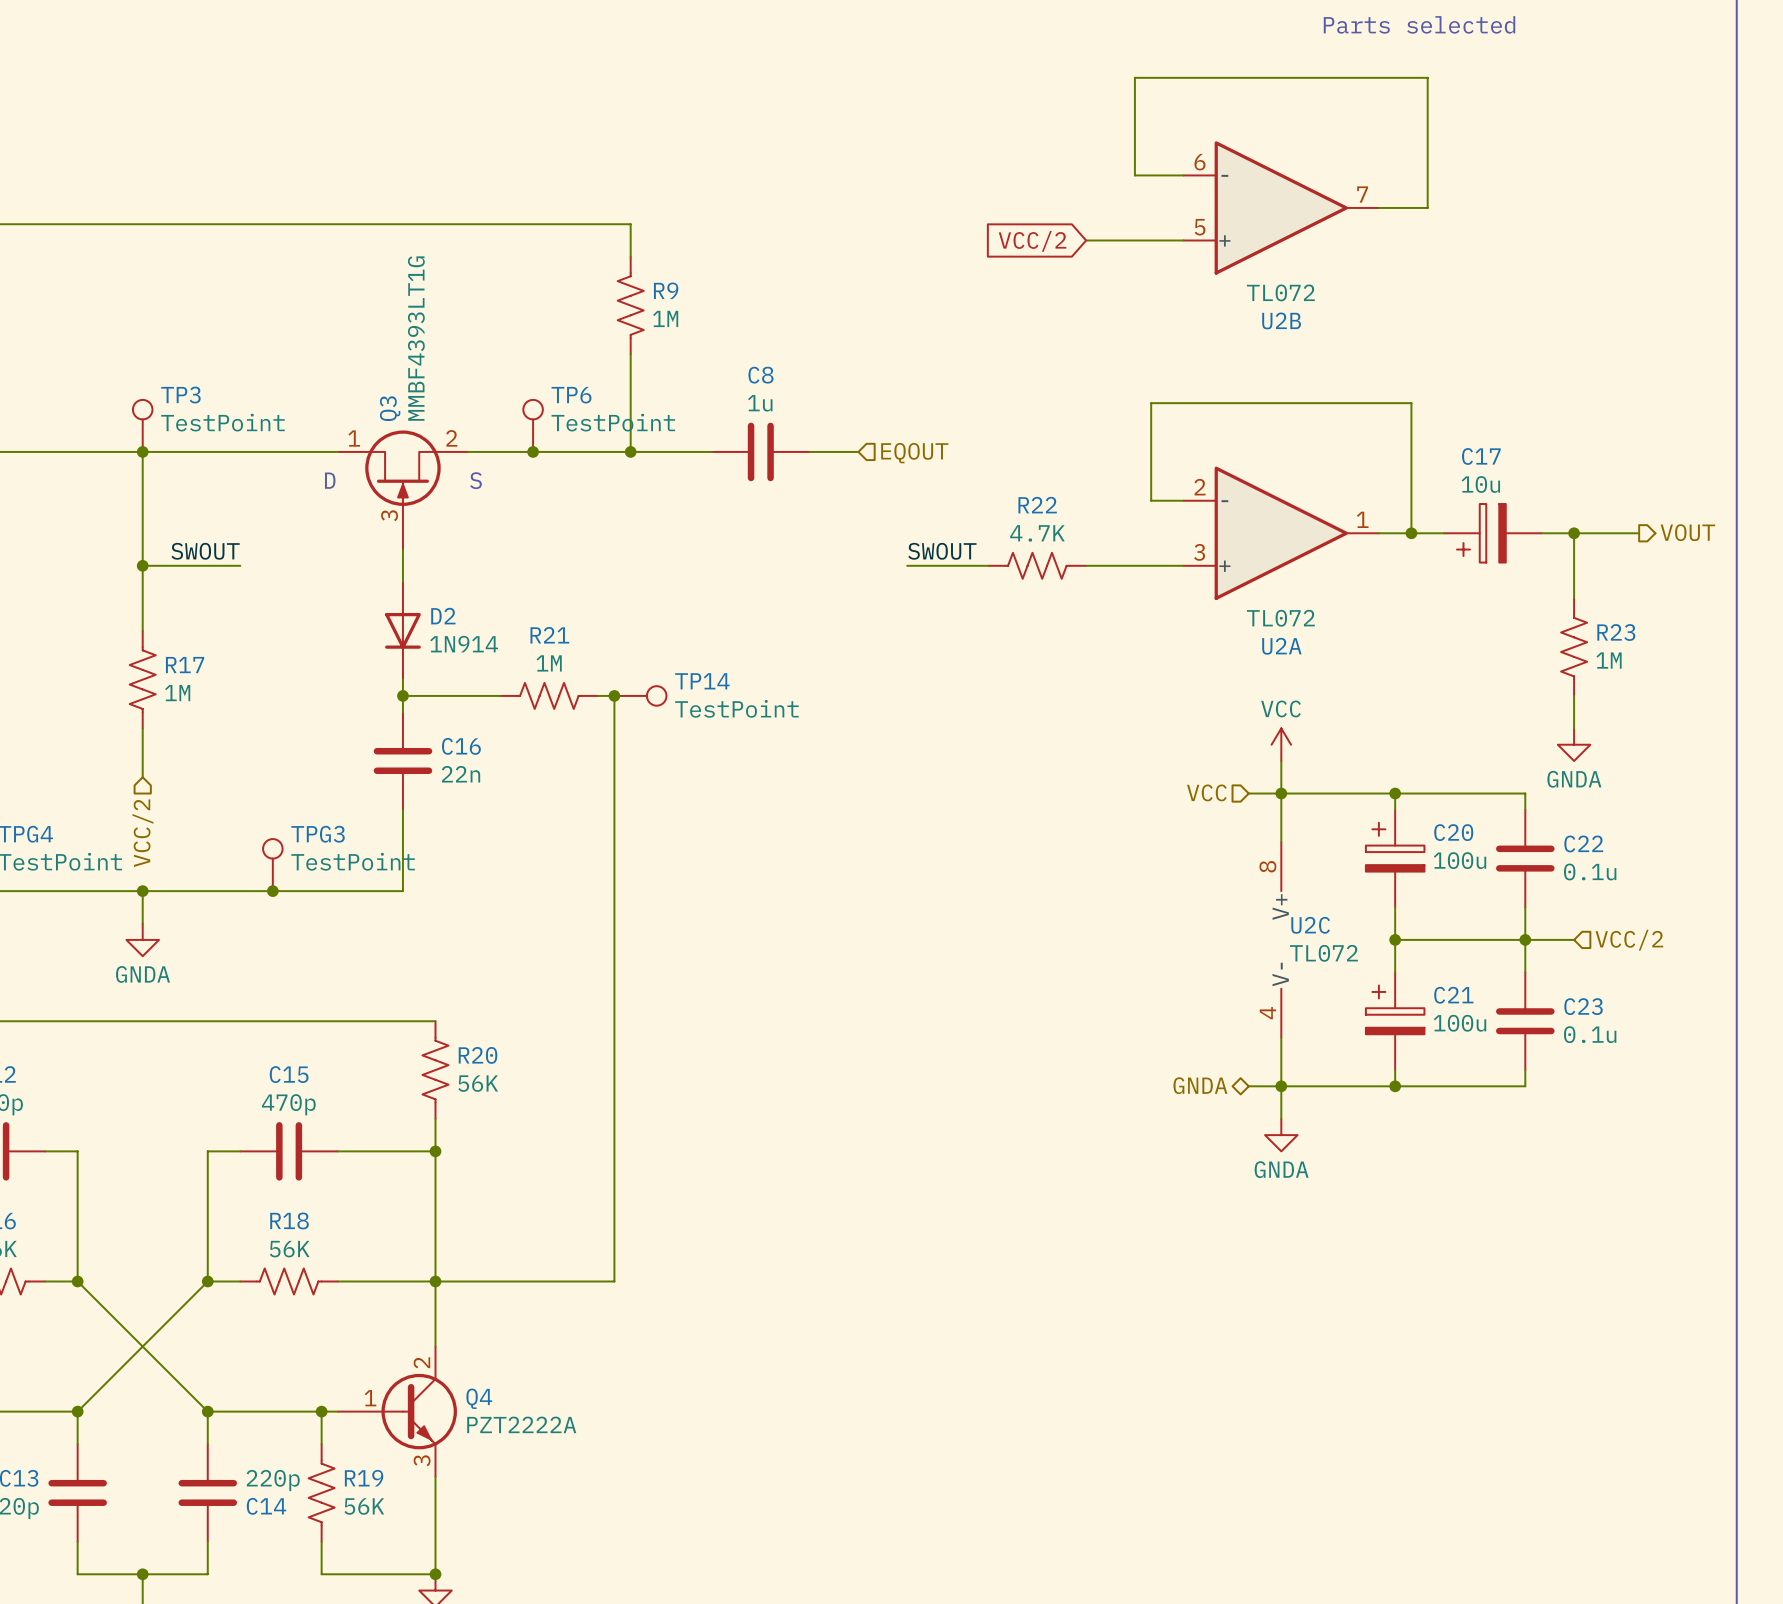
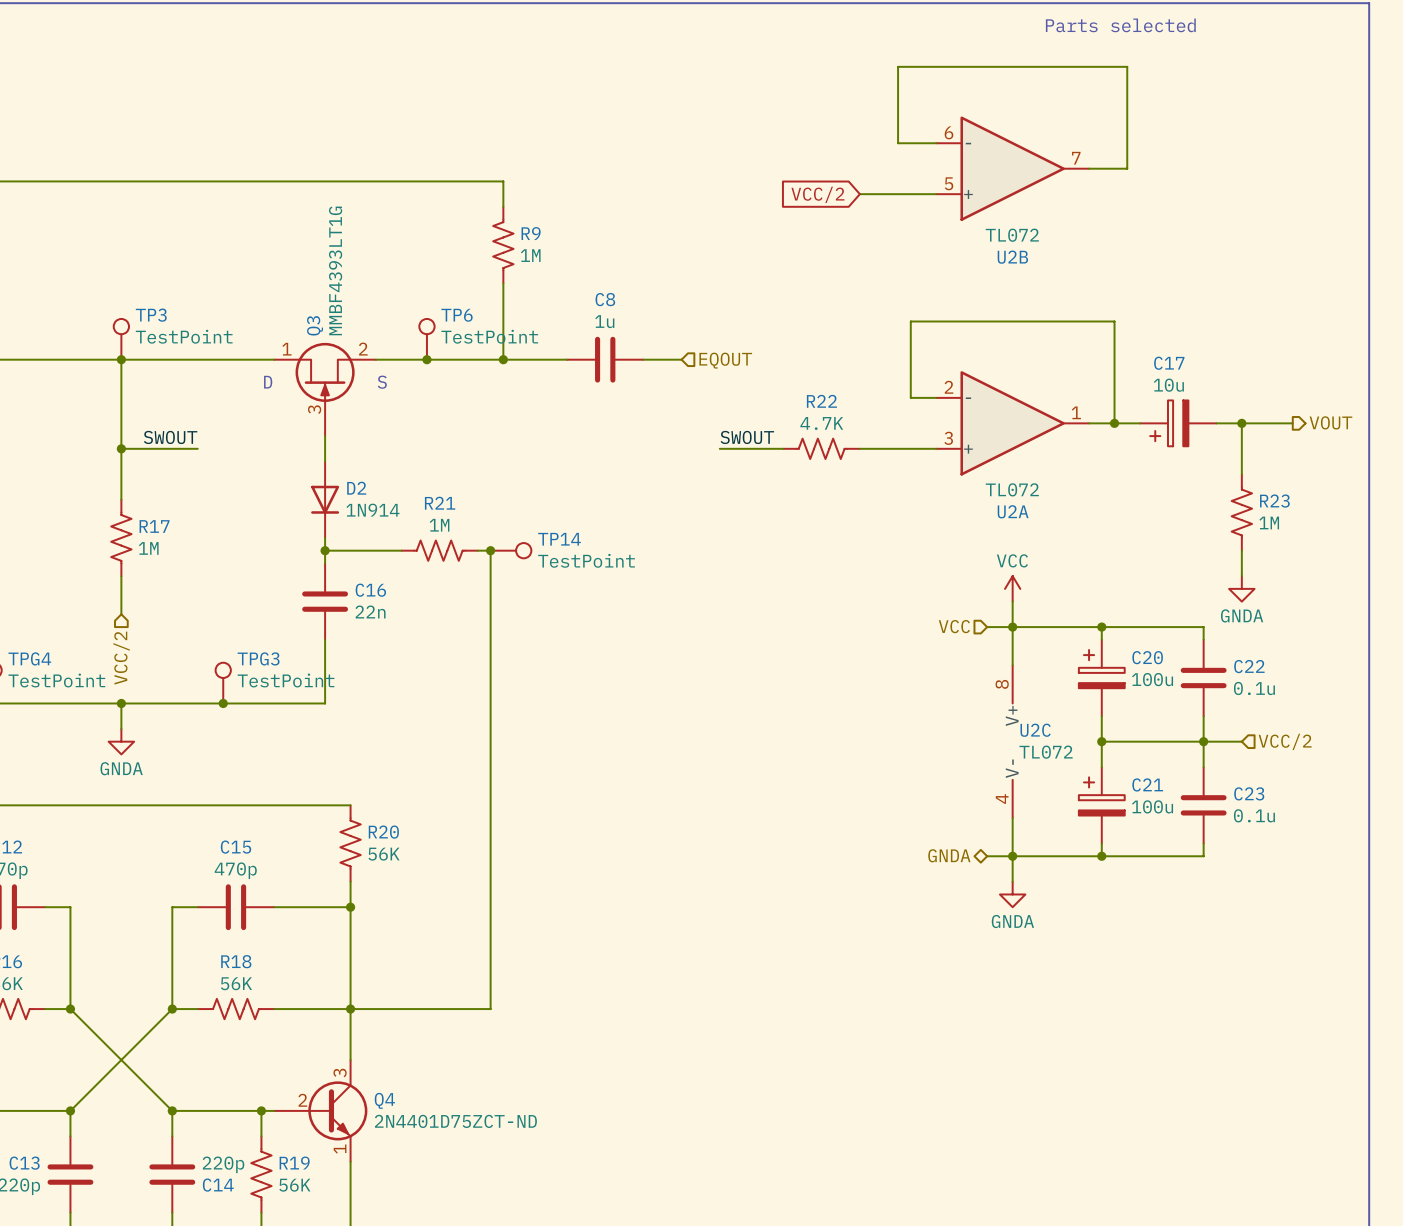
Q4 symbol: [337, 1346, 457, 1477] -> [274, 1059, 368, 1162]
Q4 value: PZT2222A (521, 1424) -> 2N4401D75ZCT-ND (455, 1121)

